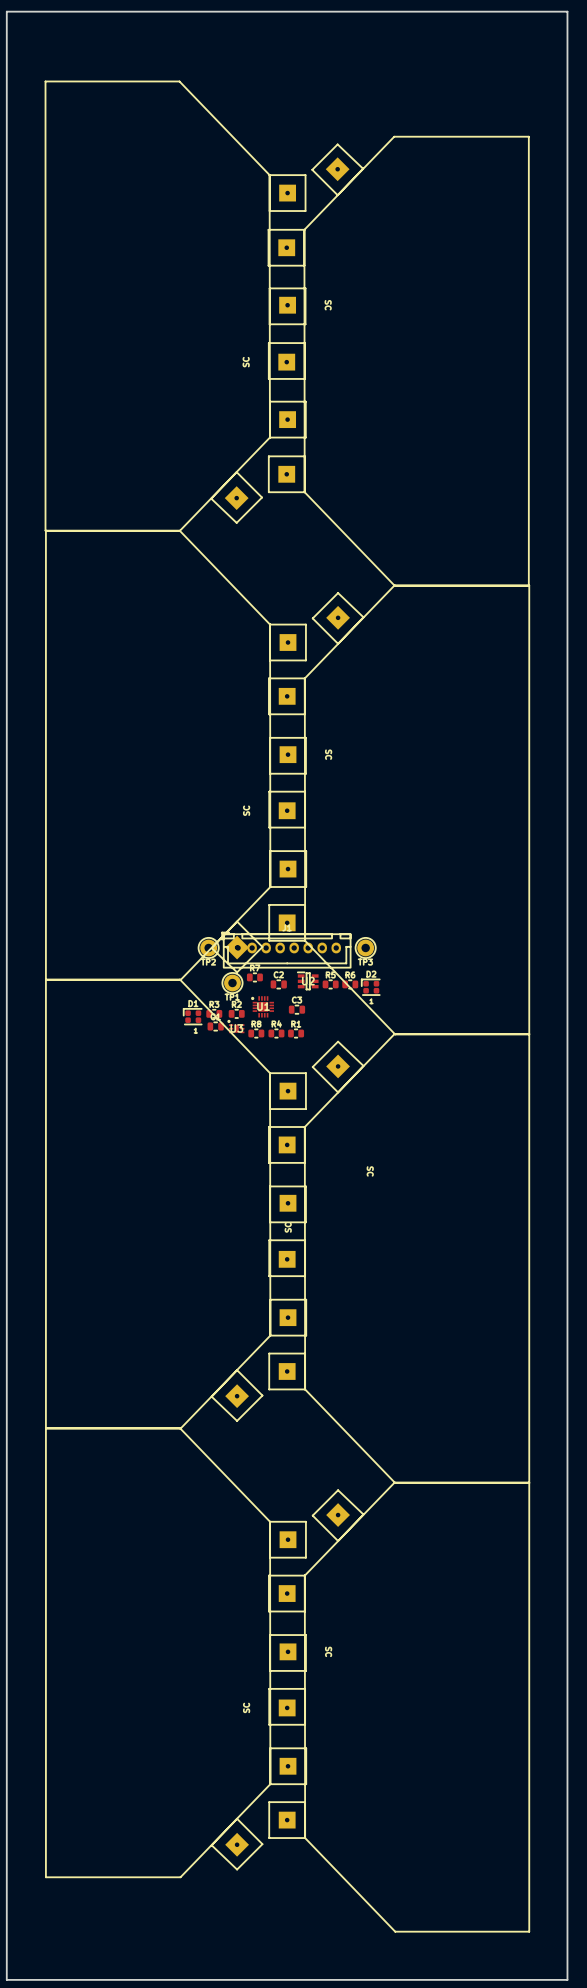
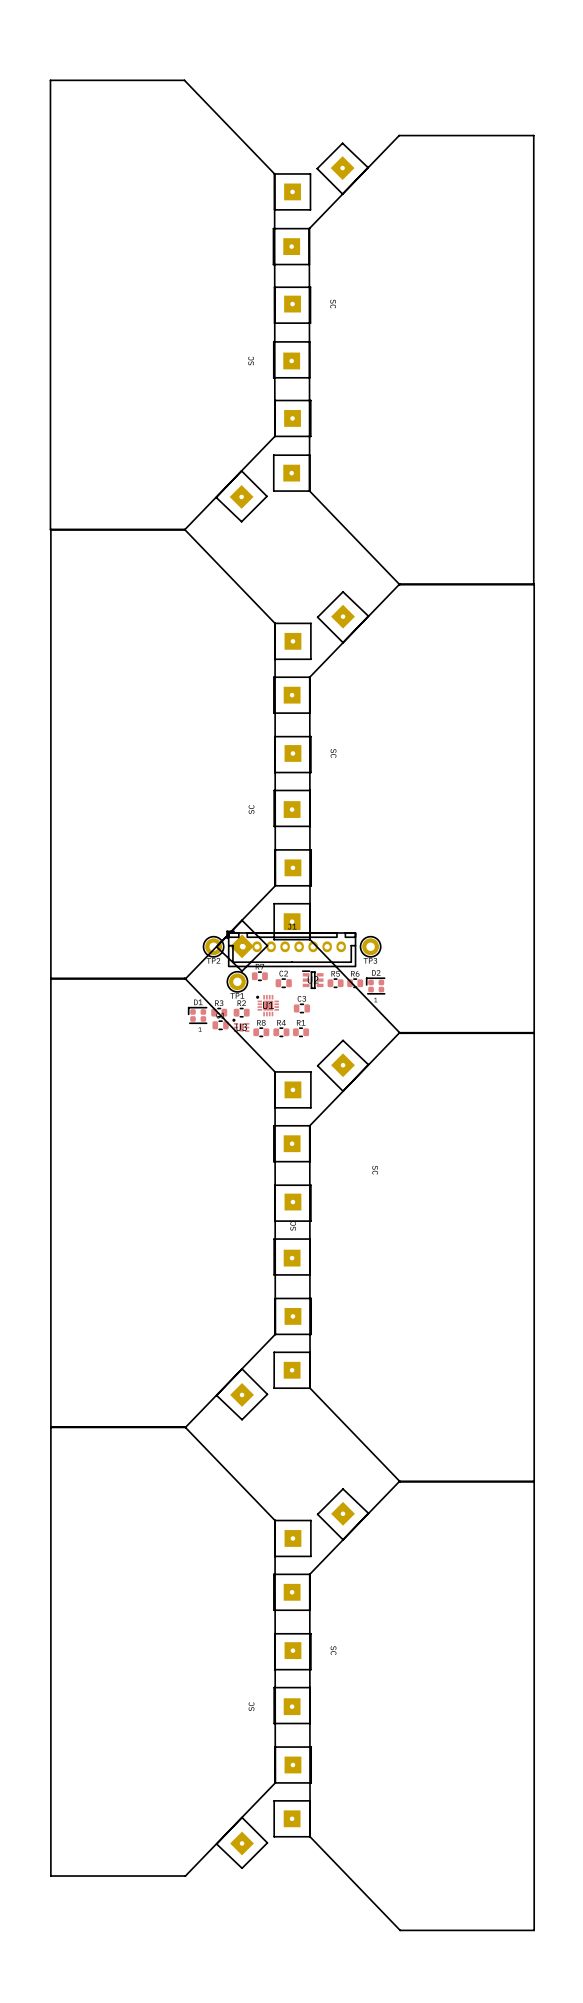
board edge: (6, 11) (567, 11) (567, 1979) (6, 1979) (6, 11) -> none

